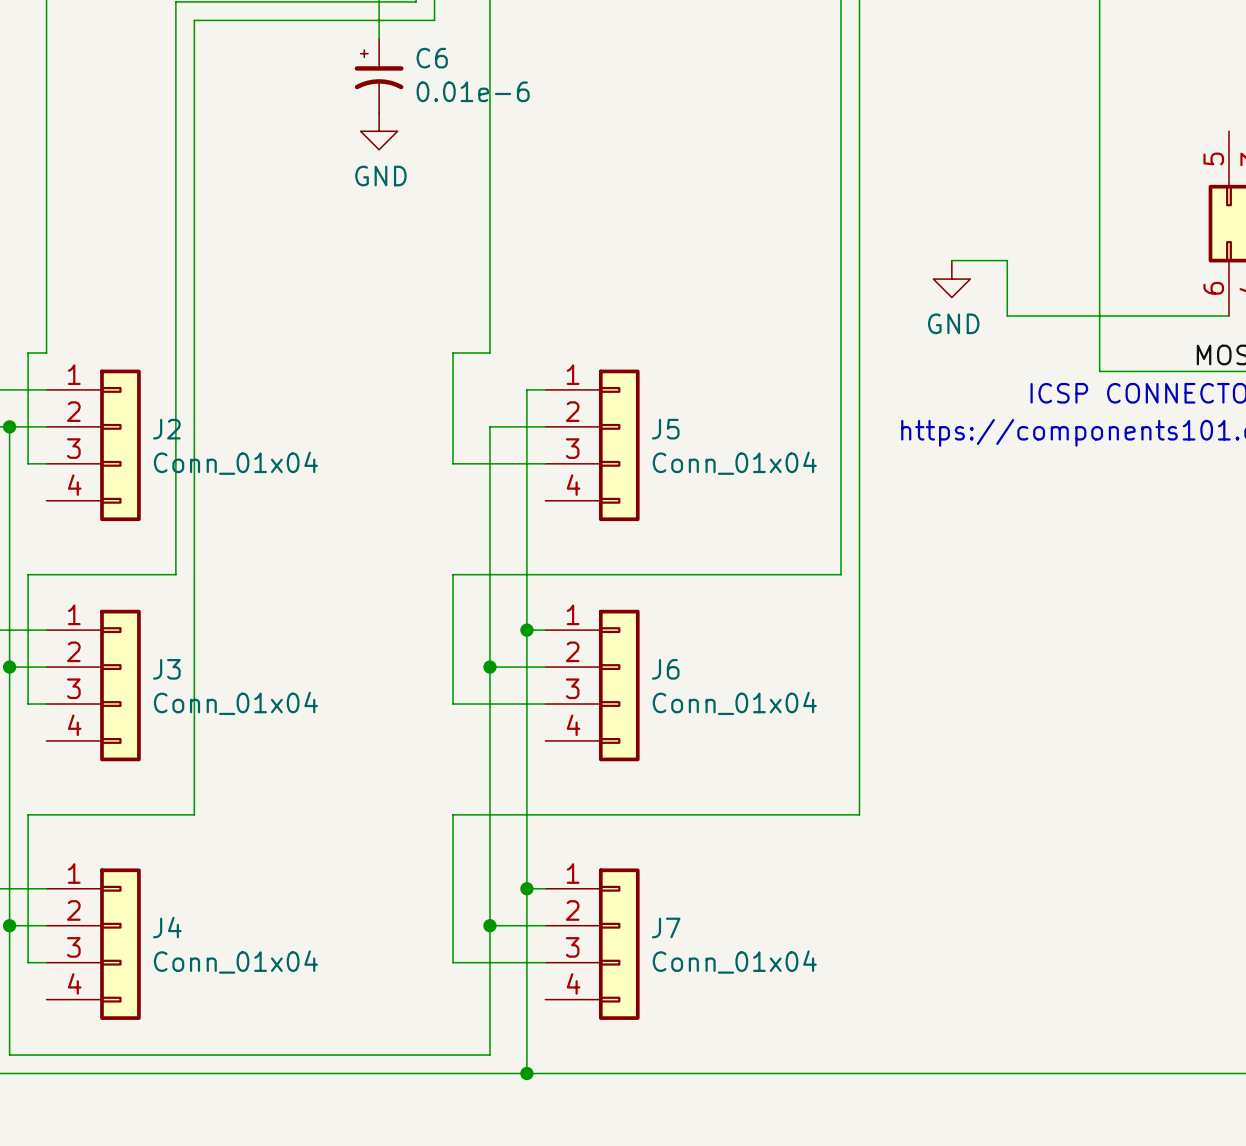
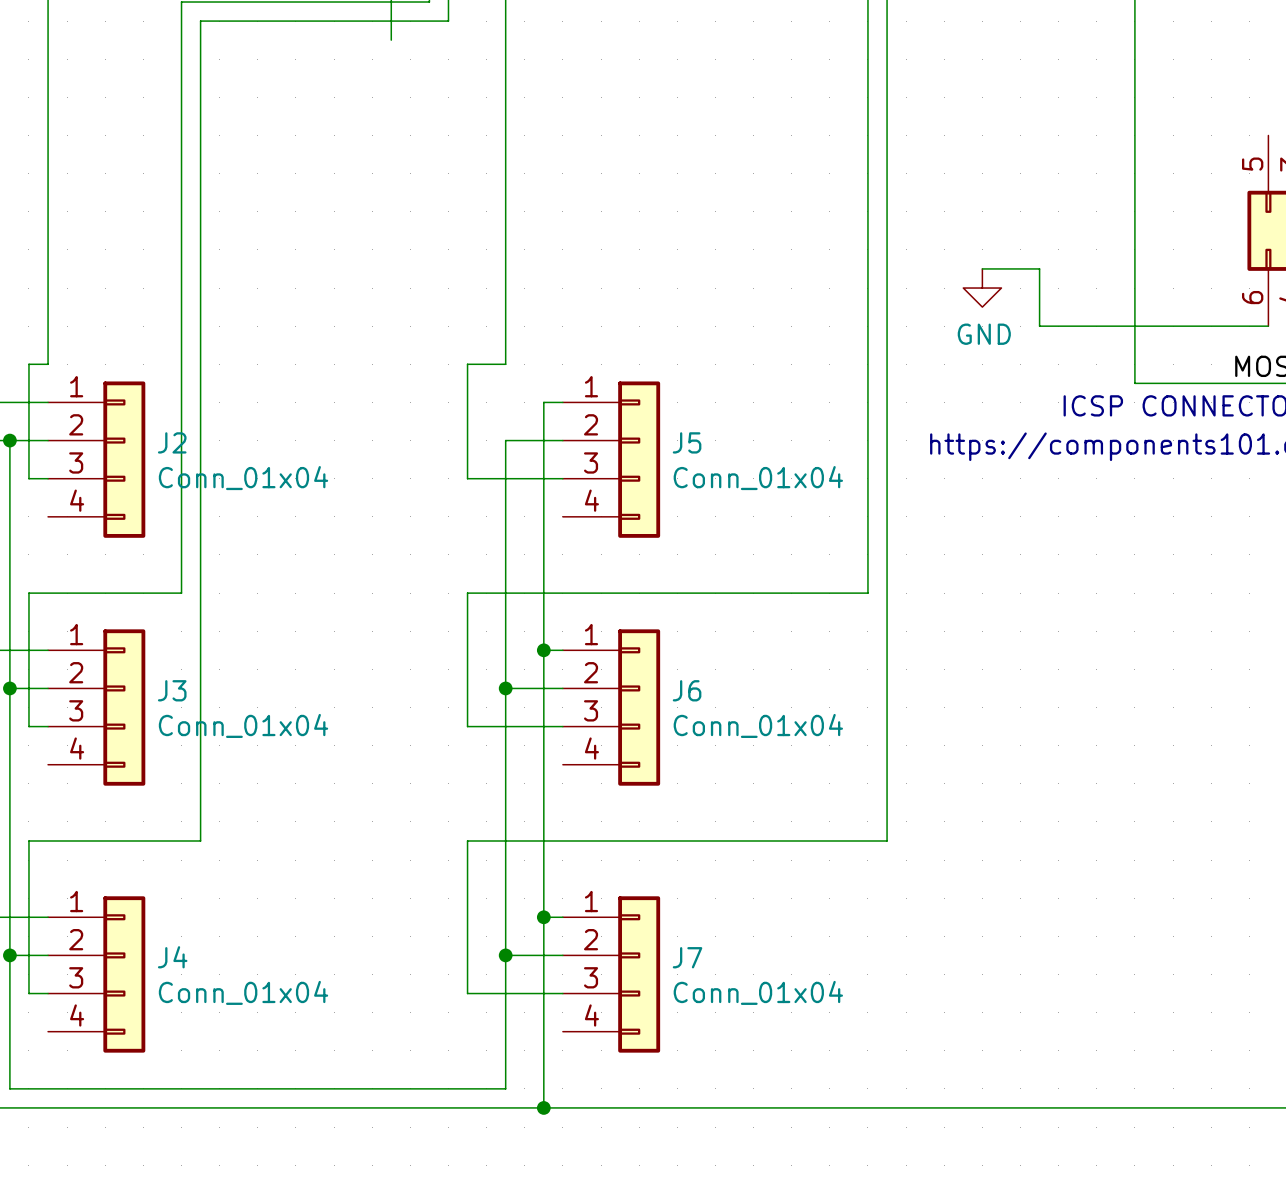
C6: 0.01e-6 (379, 75) -> none
power symbol: GND (379, 131) -> none

